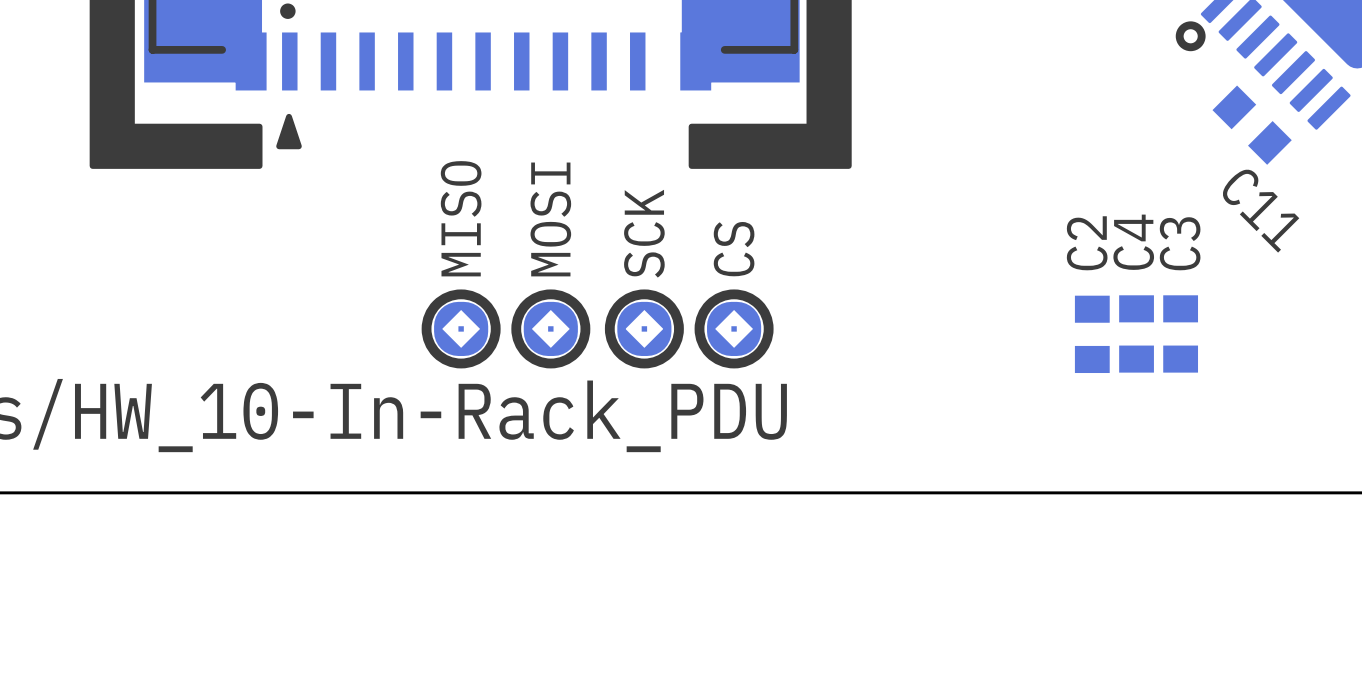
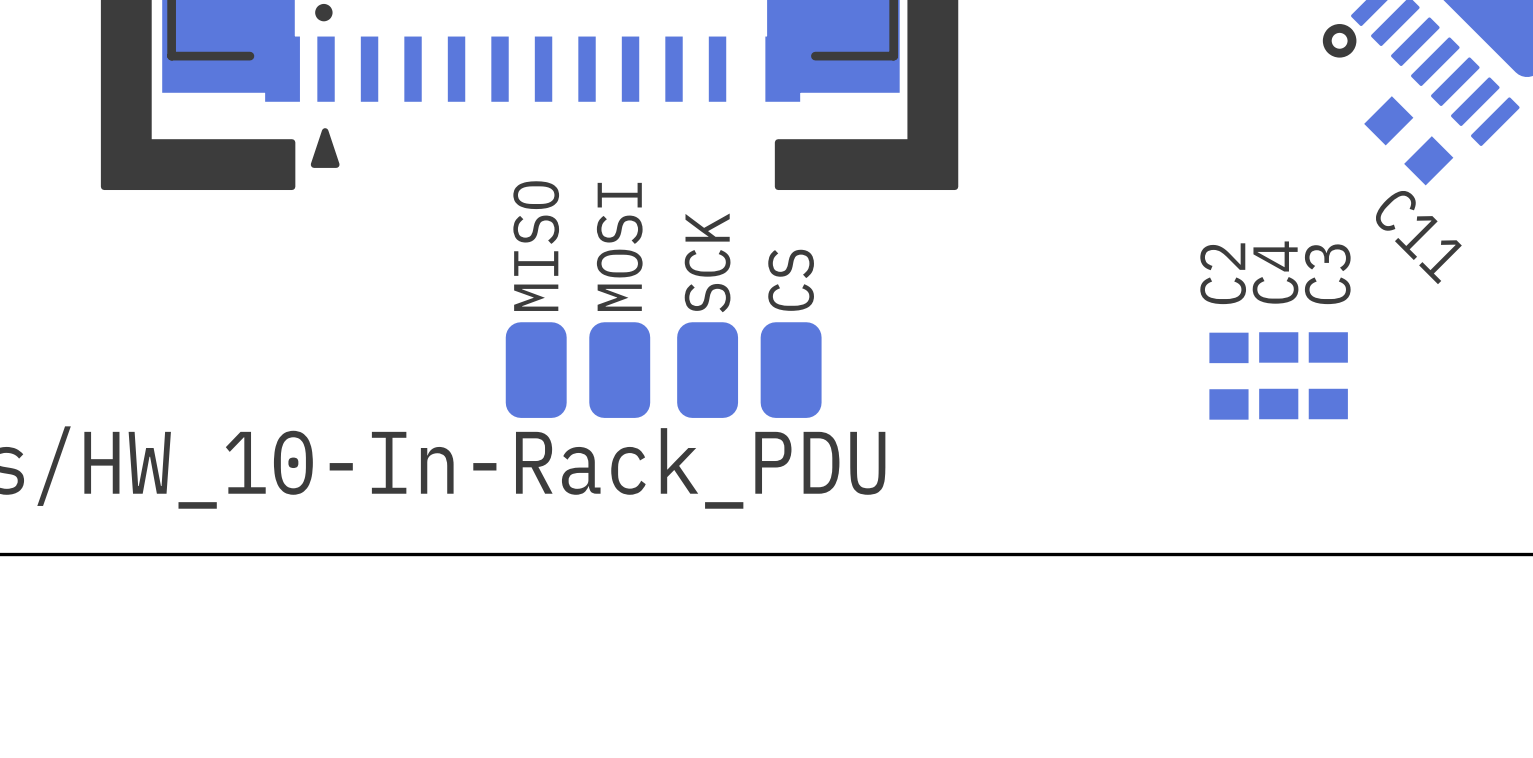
MISO footprint: [421, 289, 501, 369] -> [505, 322, 567, 418]
MOSI footprint: [511, 289, 591, 369] -> [589, 322, 651, 418]
SCK footprint: [604, 289, 684, 369] -> [677, 322, 739, 418]
CS footprint: [694, 289, 774, 369] -> [760, 322, 822, 418]

